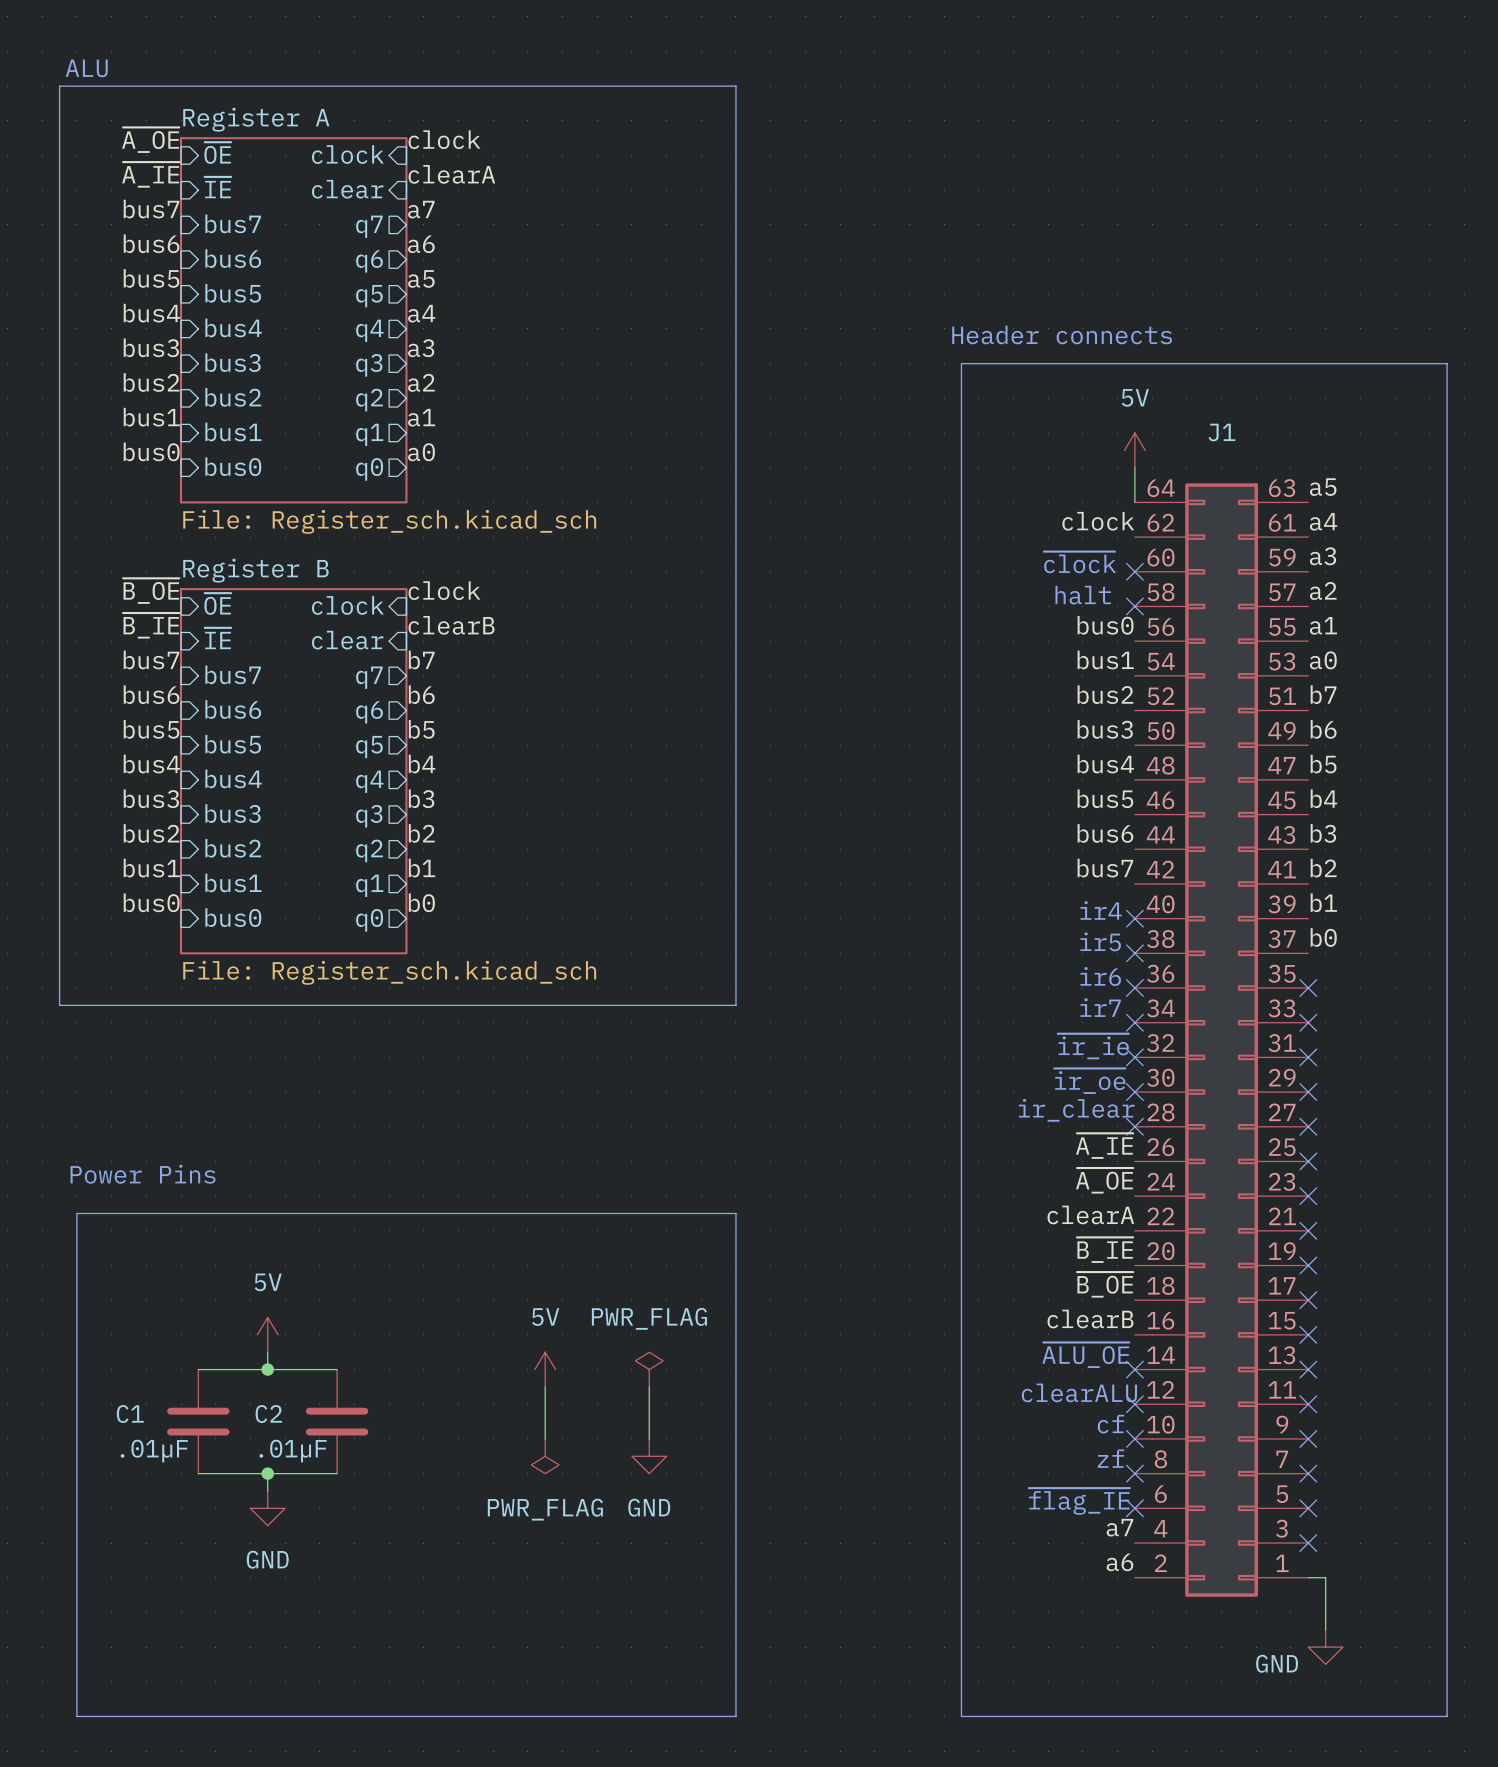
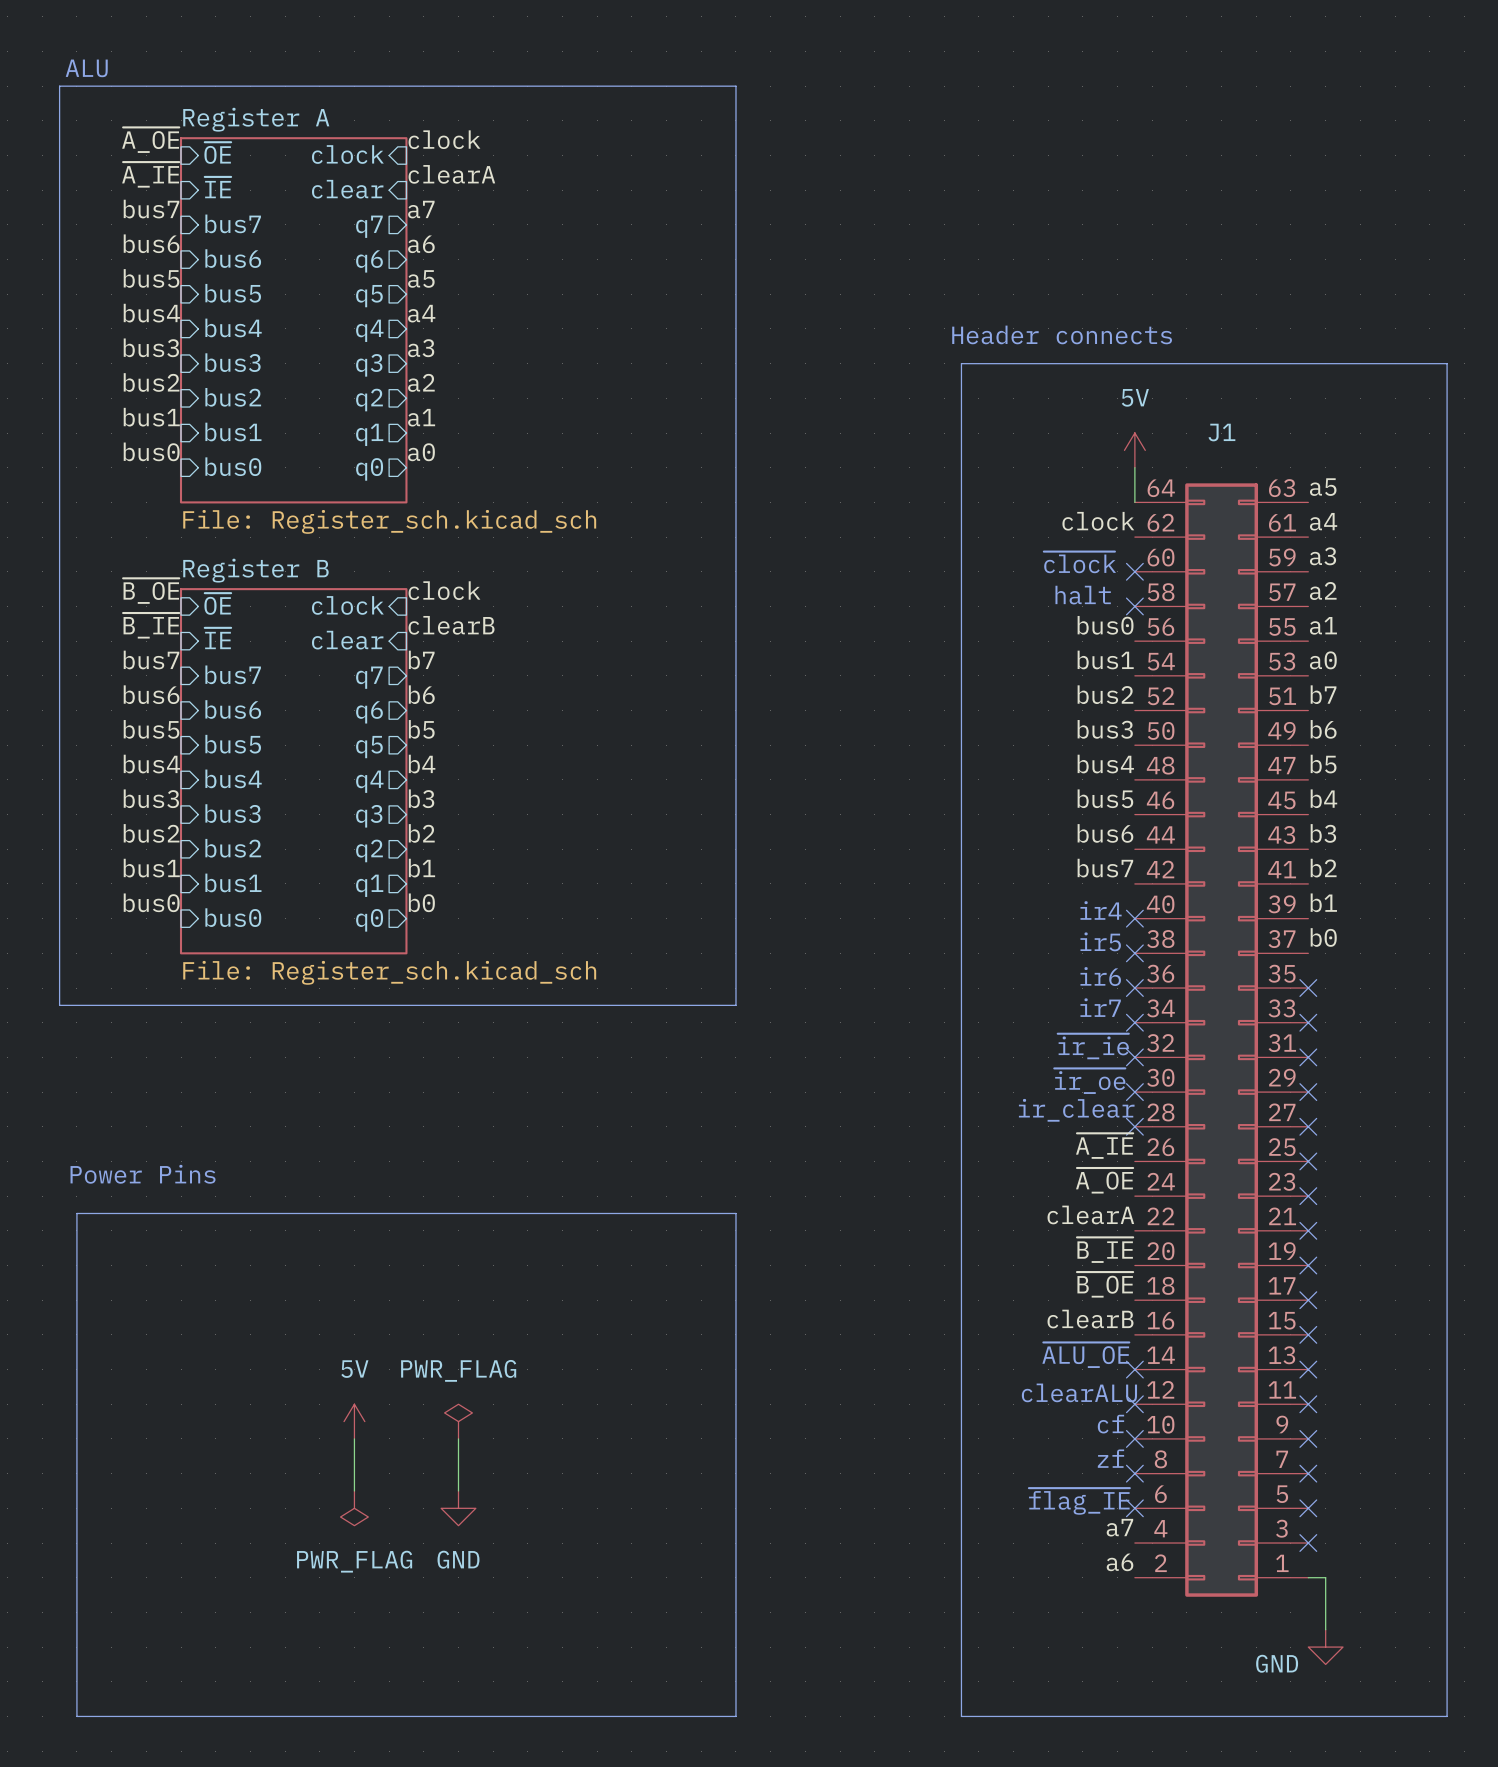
power symbol: 5V (267, 1334) -> none
wire: (267, 1352) (267, 1369) -> none
wire: (198, 1369) (337, 1369) -> none
junction: (267, 1369) -> none
power symbol: 5V (545, 1369) -> none
power symbol: PWR_FLAG (649, 1369) -> none
wire: (545, 1386) (545, 1438) -> (354, 1438) (354, 1490)
wire: (649, 1386) (649, 1438) -> (458, 1438) (458, 1490)
C1: .01µF (198, 1421) -> none
C2: .01µF (337, 1421) -> none
power symbol: none -> 5V (354, 1421)
power symbol rotation: 0° (545, 1456) -> 180° (458, 1421)
power symbol position: PWR_FLAG (545, 1456) -> PWR_FLAG (458, 1421)
power symbol: GND (649, 1456) -> none
wire: (198, 1473) (337, 1473) -> none
wire: (267, 1473) (267, 1490) -> none
junction: (267, 1473) -> none
power symbol: GND (267, 1508) -> none
power symbol: none -> PWR_FLAG (354, 1508)
power symbol: none -> GND (458, 1508)

